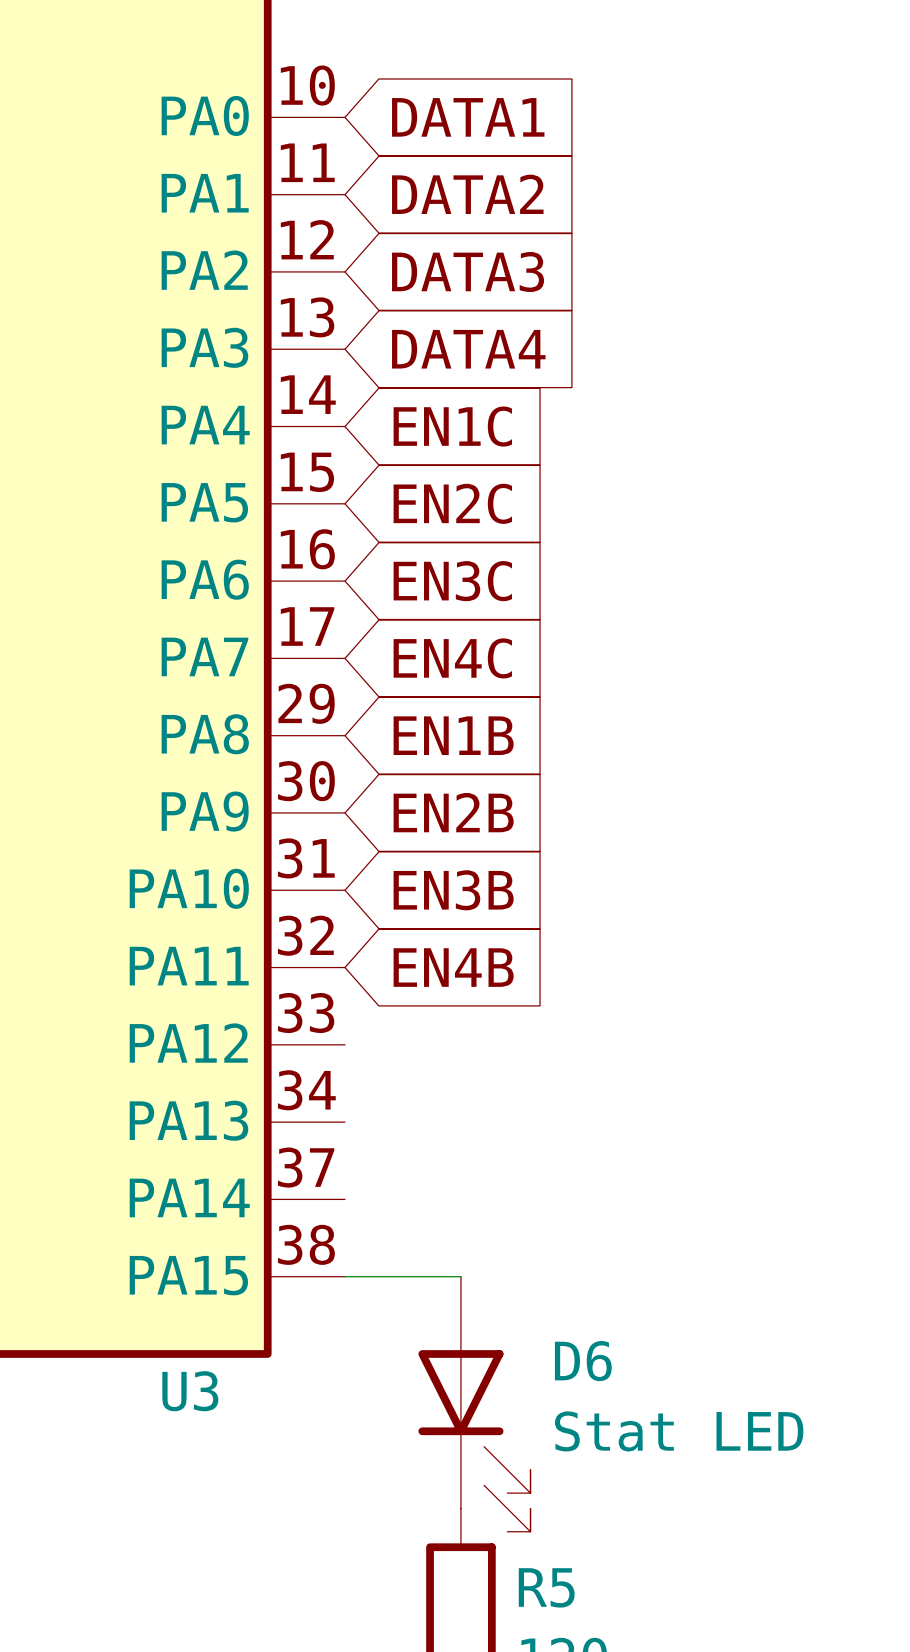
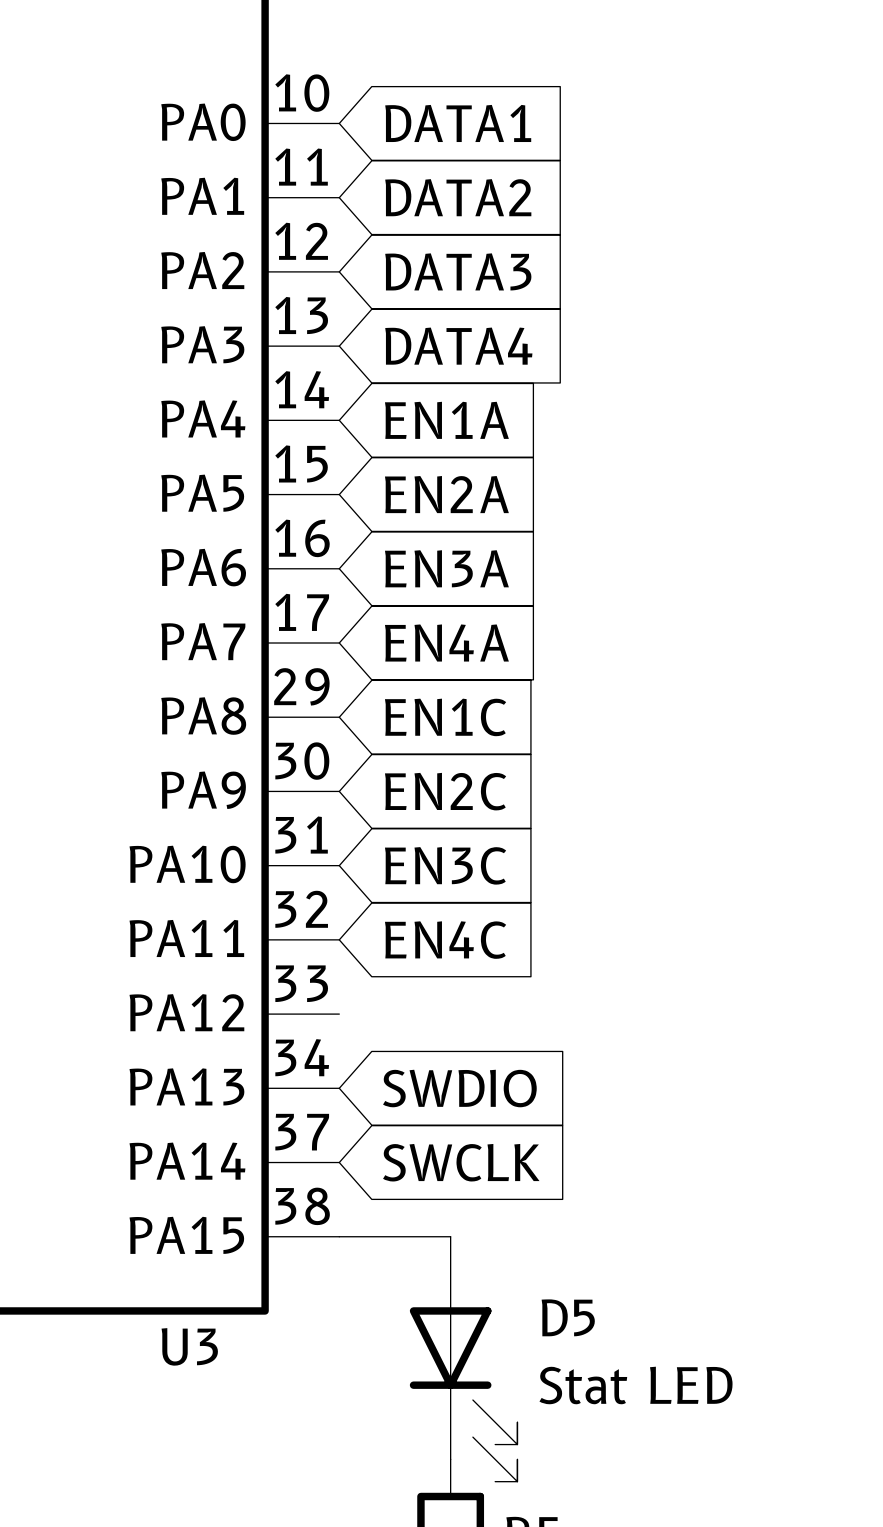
global label: EN1C (452, 426) -> EN1A (446, 420)
global label: EN2C (452, 503) -> EN2A (446, 494)
global label: EN3C (452, 581) -> EN3A (446, 568)
global label: EN4C (452, 658) -> EN4A (446, 643)
global label: EN1B (453, 735) -> EN1C (445, 717)
global label: EN2B (453, 812) -> EN2C (445, 791)
global label: EN3B (453, 890) -> EN3C (445, 865)
global label: EN4B (453, 967) -> EN4C (445, 940)
global label: none -> SWDIO (459, 1088)
global label: none -> SWCLK (461, 1162)
D6 name: D6 (583, 1361) -> D5 (568, 1317)

